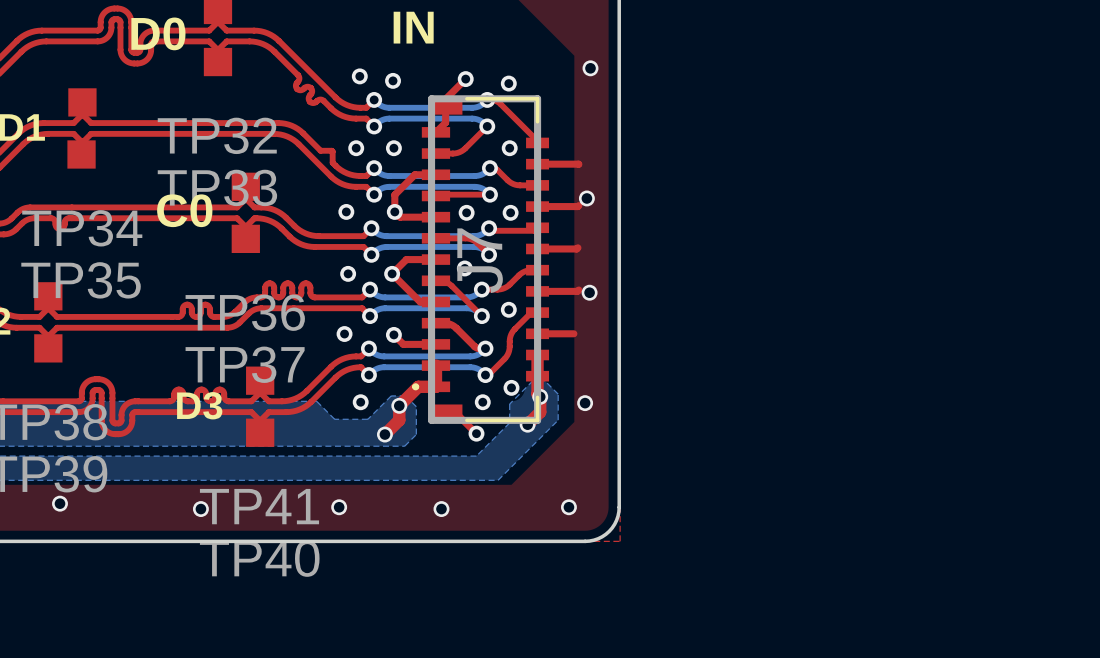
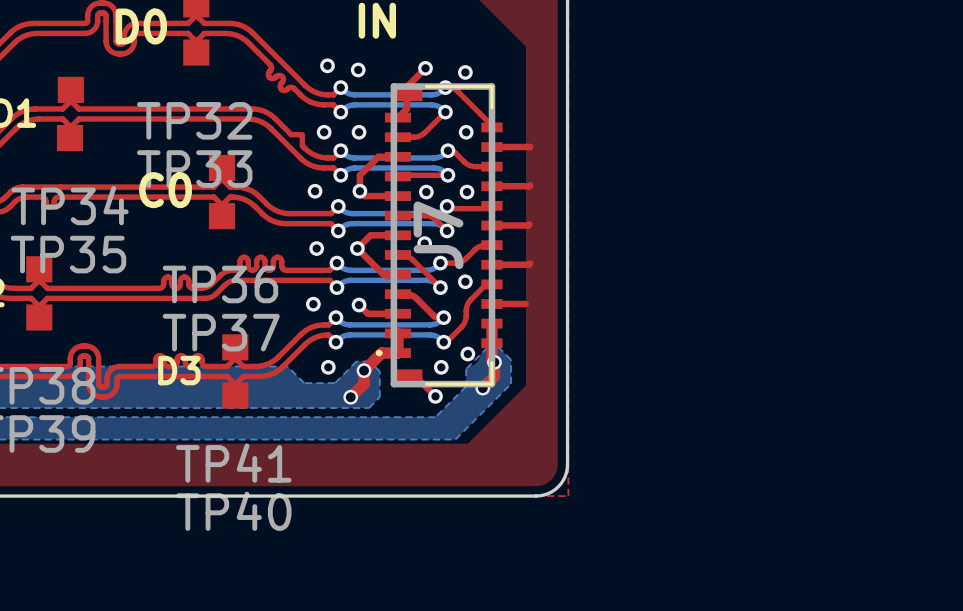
via: (590, 68) -> none
via: (586, 198) -> none
via: (589, 292) -> none
via: (585, 403) -> none
via: (60, 503) -> none
via: (339, 507) -> none
via: (568, 507) -> none
via: (200, 509) -> none
via: (441, 509) -> none

